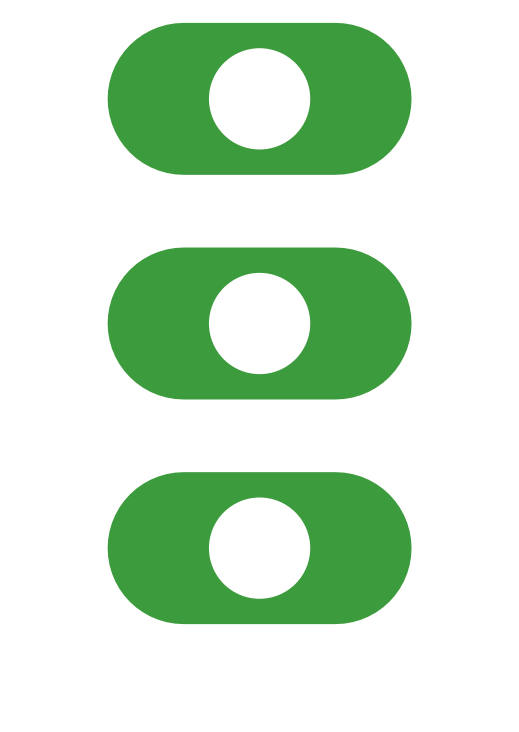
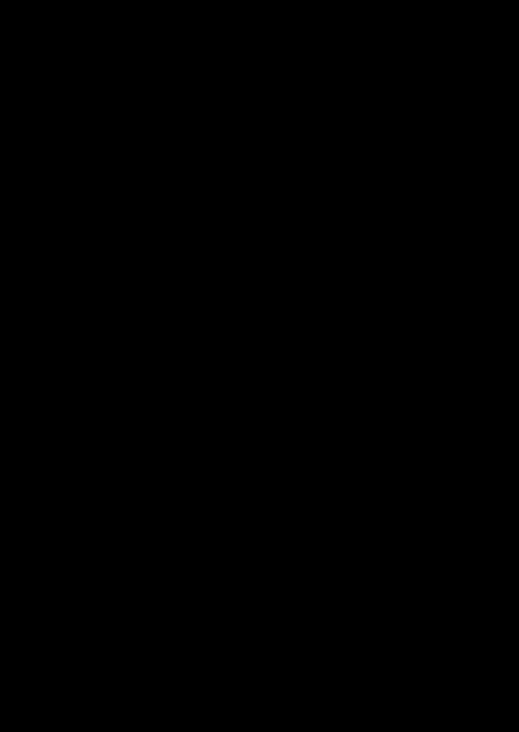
part: (259, 323) -> none

